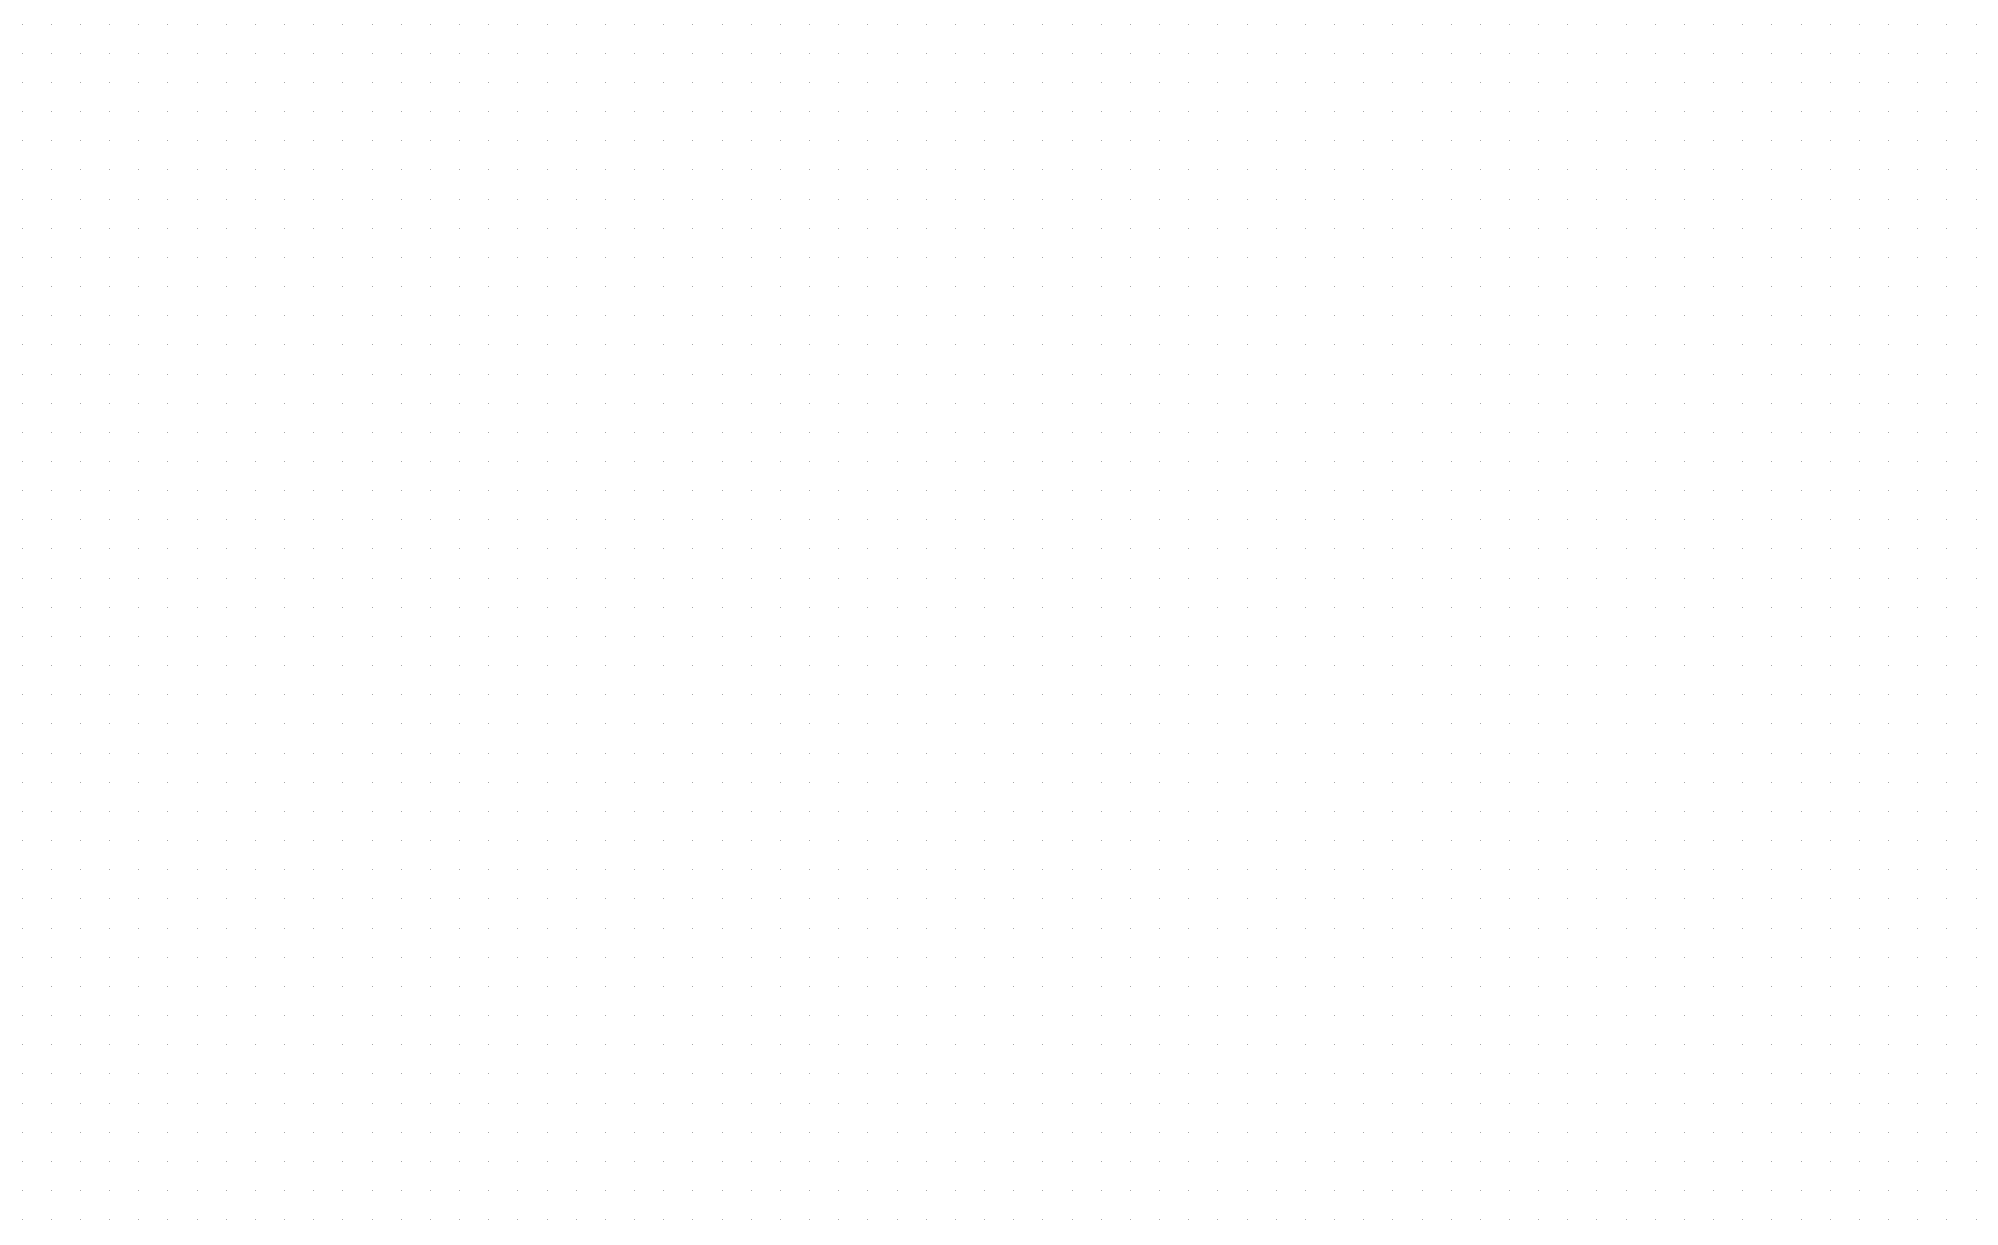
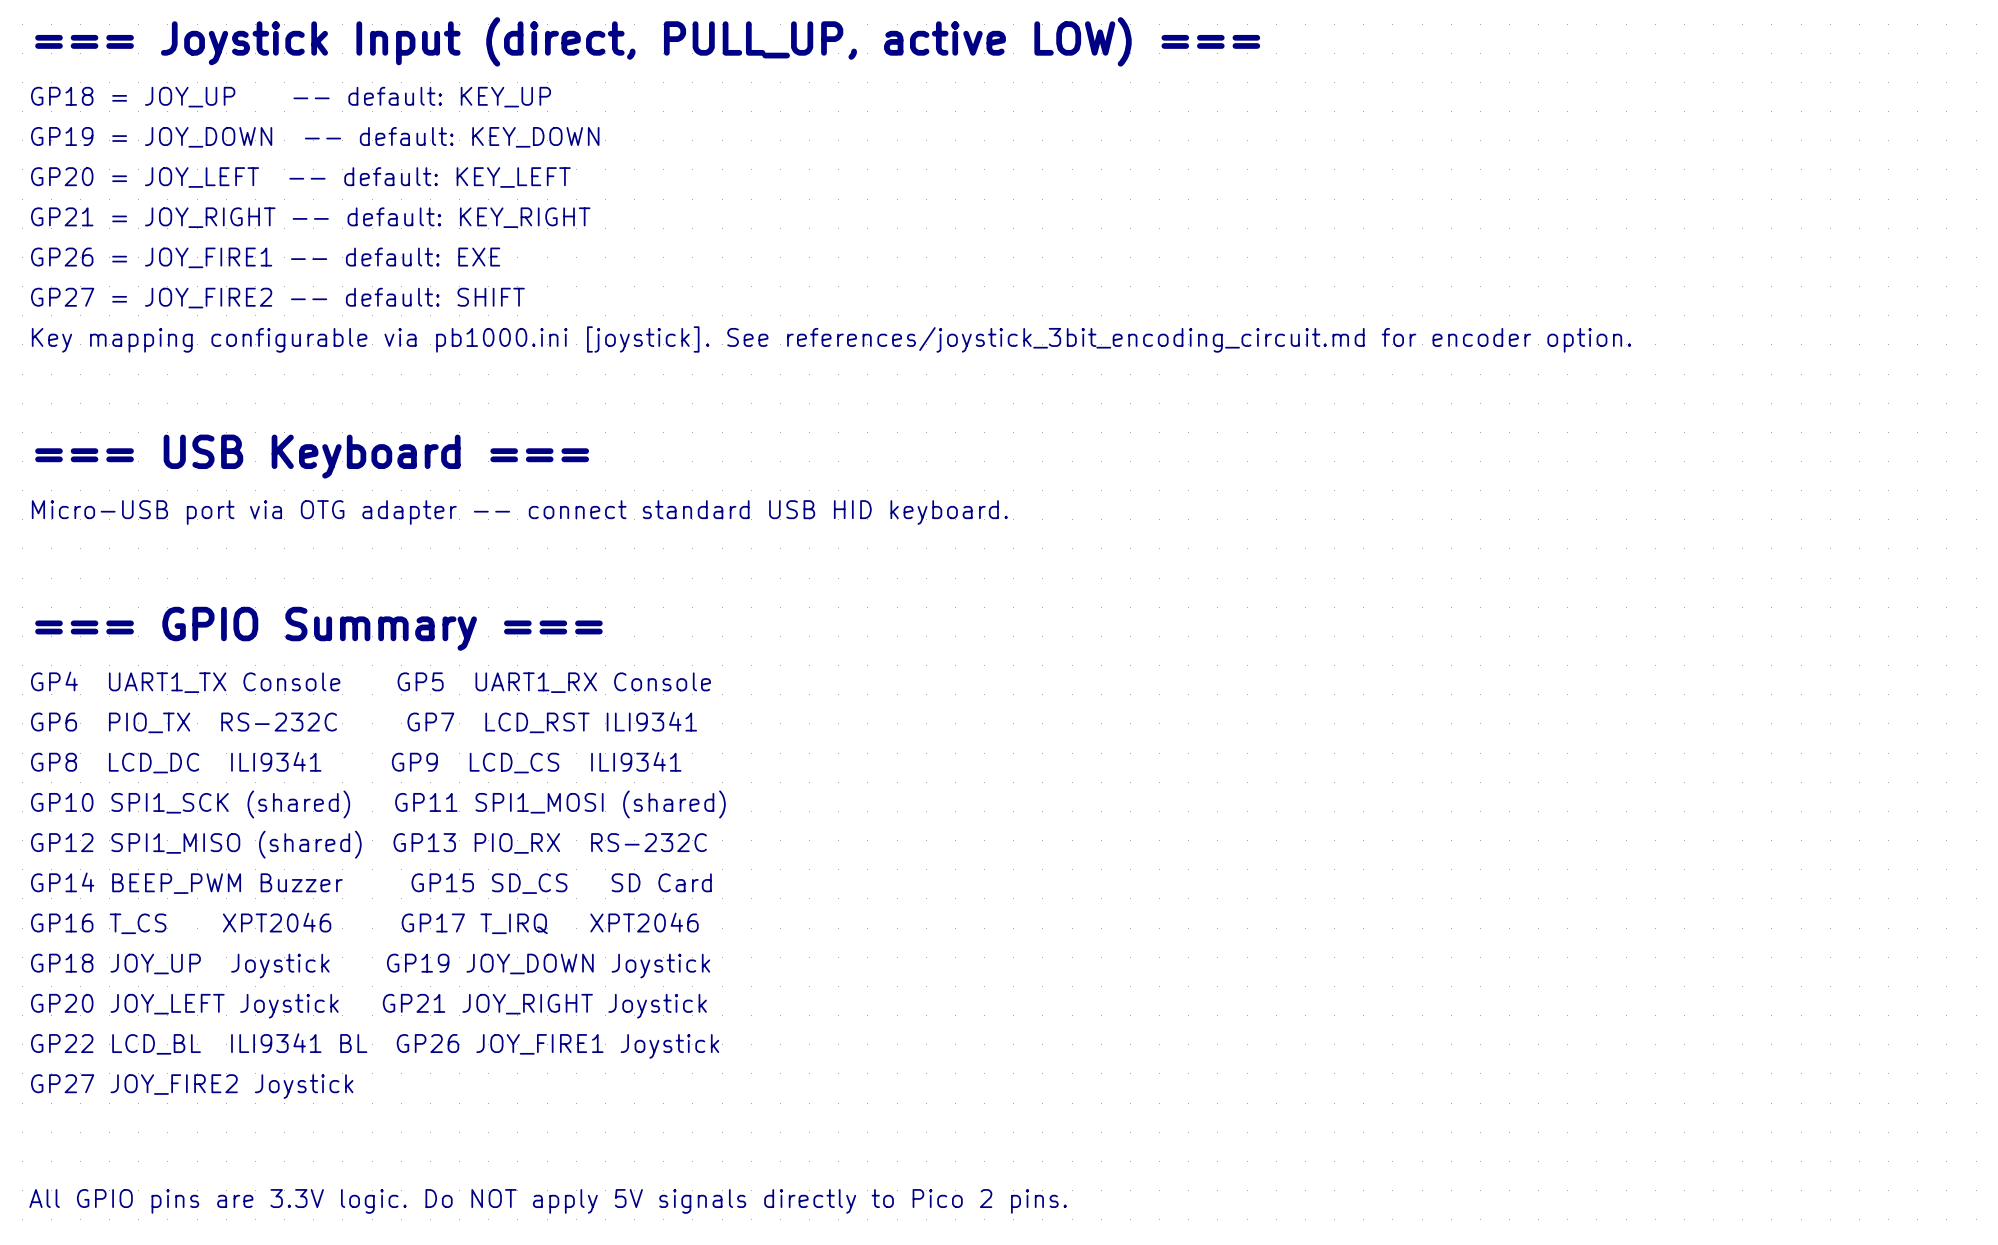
text: none -> === Joystick Input (direct, PULL_UP, active LOW) === (647, 41)
text: none -> GP18 = JOY_UP -- default: KEY_UP (291, 97)
text: none -> GP19 = JOY_DOWN -- default: KEY_DOWN (315, 137)
text: none -> GP20 = JOY_LEFT -- default: KEY_LEFT (300, 177)
text: none -> GP21 = JOY_RIGHT -- default: KEY_RIGHT (310, 217)
text: none -> GP26 = JOY_FIRE1 -- default: EXE (265, 257)
text: none -> GP27 = JOY_FIRE2 -- default: SHIFT (277, 298)
text: none -> Key mapping configurable via pb1000.ini [joystick]. See references/joystick_3bit_encoding_circuit.md for encoder option. (831, 339)
text: none -> === USB Keyboard === (312, 456)
text: none -> Micro-USB port via OTG adapter -- connect standard USB HID keyboard. (519, 512)
text: none -> === GPIO Summary === (318, 628)
text: none -> GP4 UART1_TX Console GP5 UART1_RX Console (371, 682)
text: none -> GP6 PIO_TX RS-232C GP7 LCD_RST ILI9341 (364, 722)
text: none -> GP8 LCD_DC ILI9341 GP9 LCD_CS ILI9341 (356, 762)
text: none -> GP10 SPI1_SCK (shared) GP11 SPI1_MOSI (shared) (378, 804)
text: none -> GP12 SPI1_MISO (shared) GP13 PIO_RX RS-232C (368, 844)
text: none -> GP14 BEEP_PWM Buzzer GP15 SD_CS SD Card (371, 883)
text: none -> GP16 T_CS XPT2046 GP17 T_IRQ XPT2046 (364, 923)
text: none -> GP18 JOY_UP Joystick GP19 JOY_DOWN Joystick (370, 966)
text: none -> GP20 JOY_LEFT Joystick GP21 JOY_RIGHT Joystick (368, 1006)
text: none -> GP22 LCD_BL ILI9341 BL GP26 JOY_FIRE1 Joystick (375, 1046)
text: none -> GP27 JOY_FIRE2 Joystick (192, 1086)
text: none -> All GPIO pins are 3.3V logic. Do NOT apply 5V signals directly to Pico 2 pins. (548, 1201)

